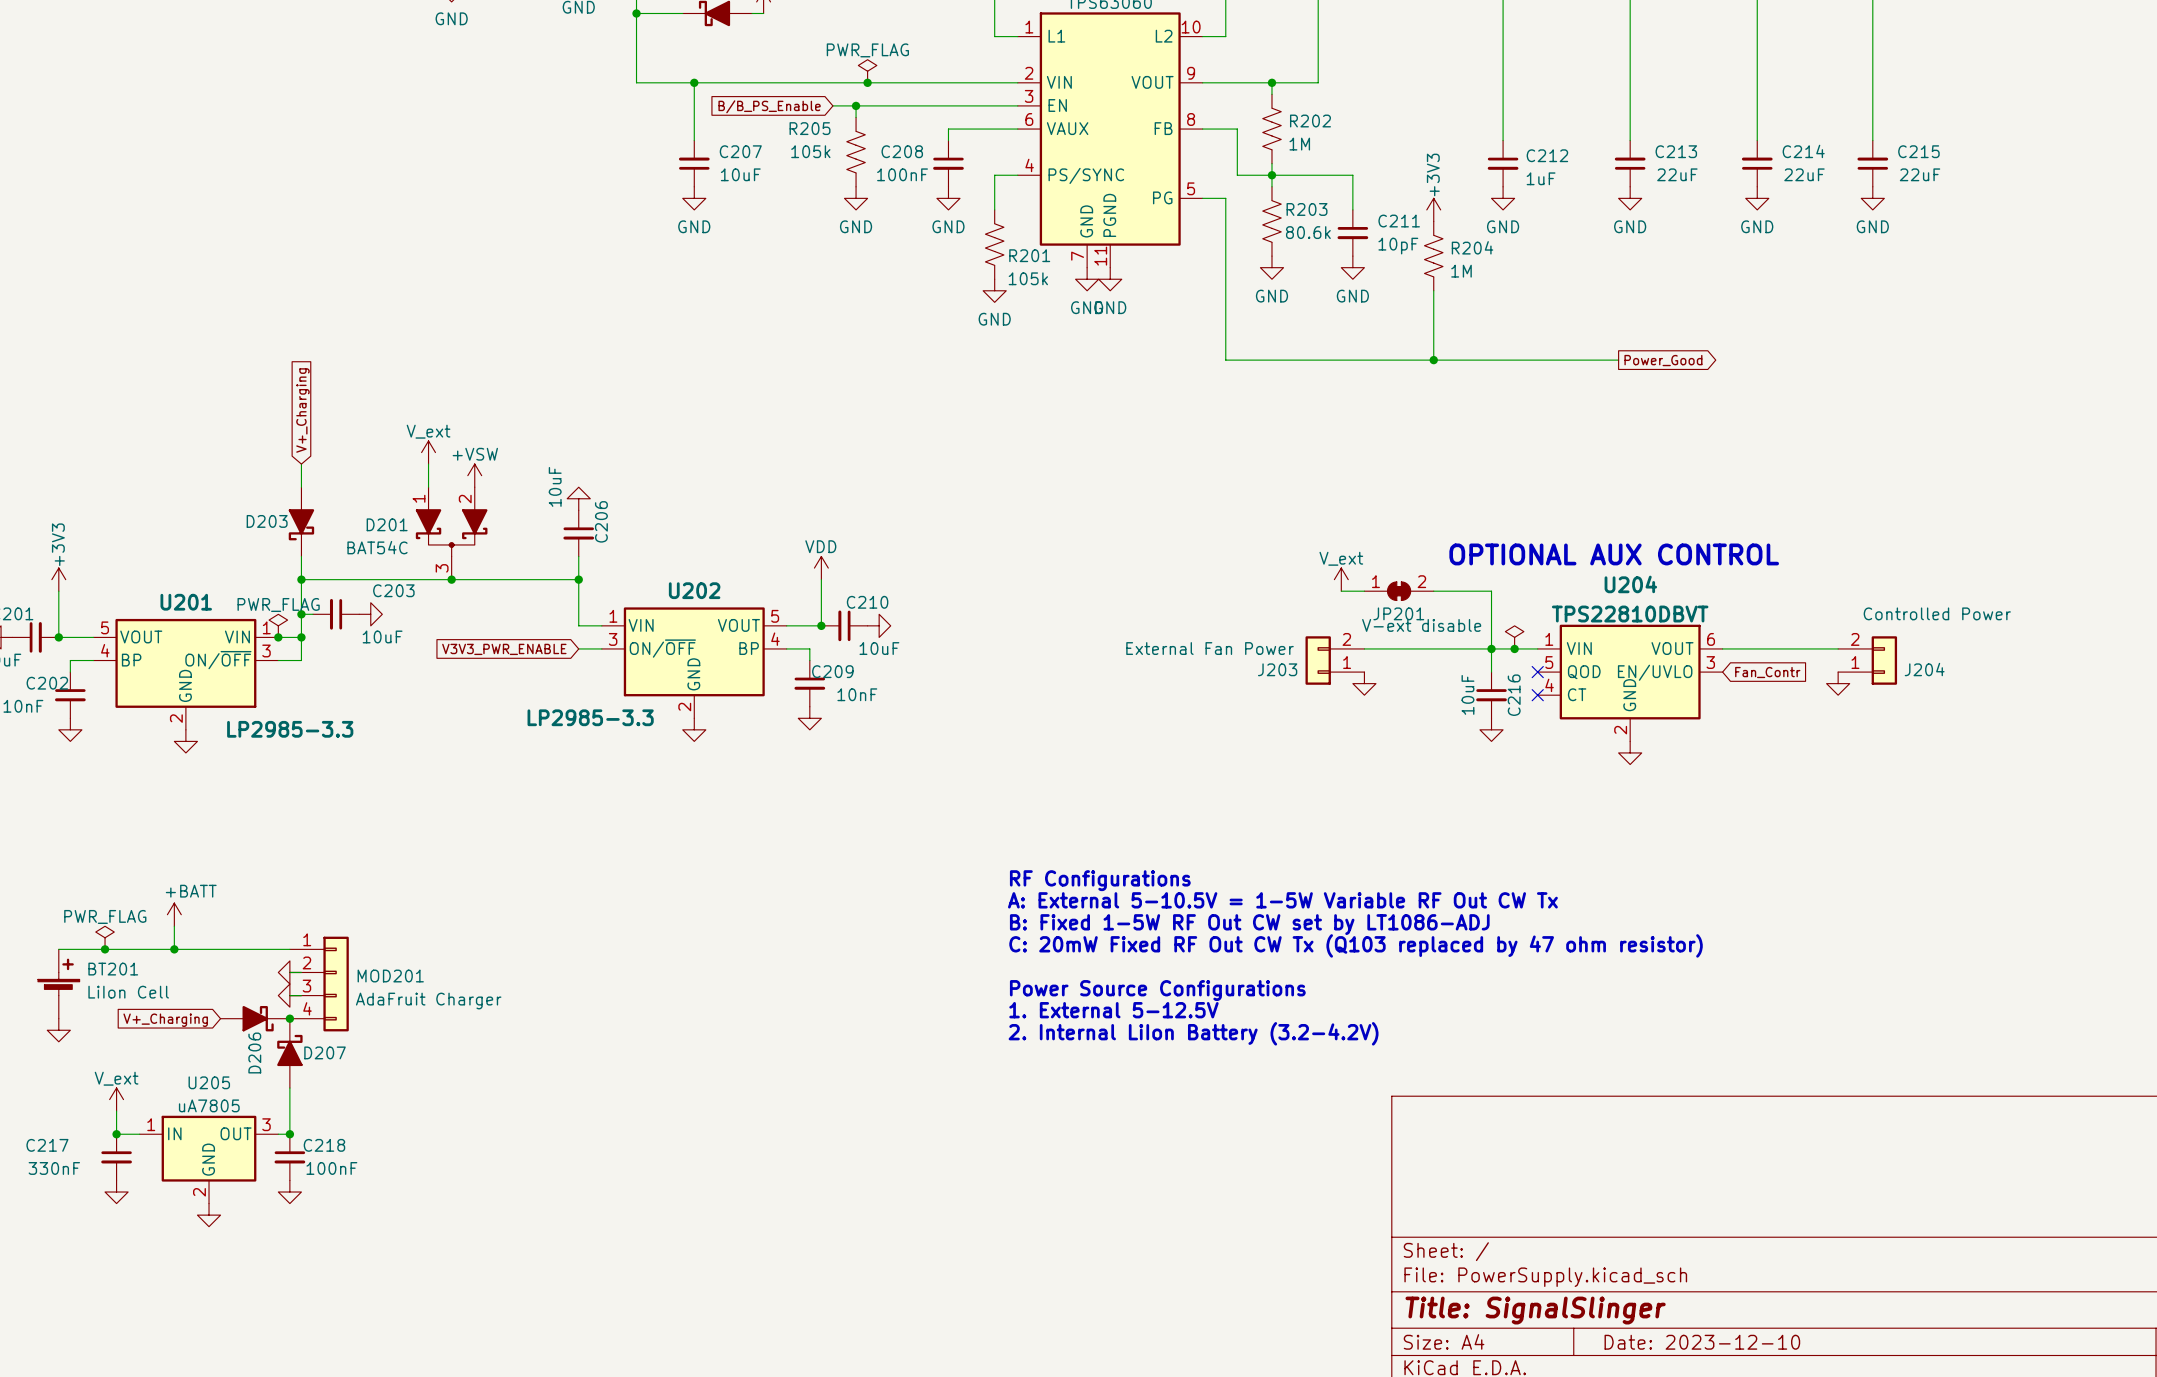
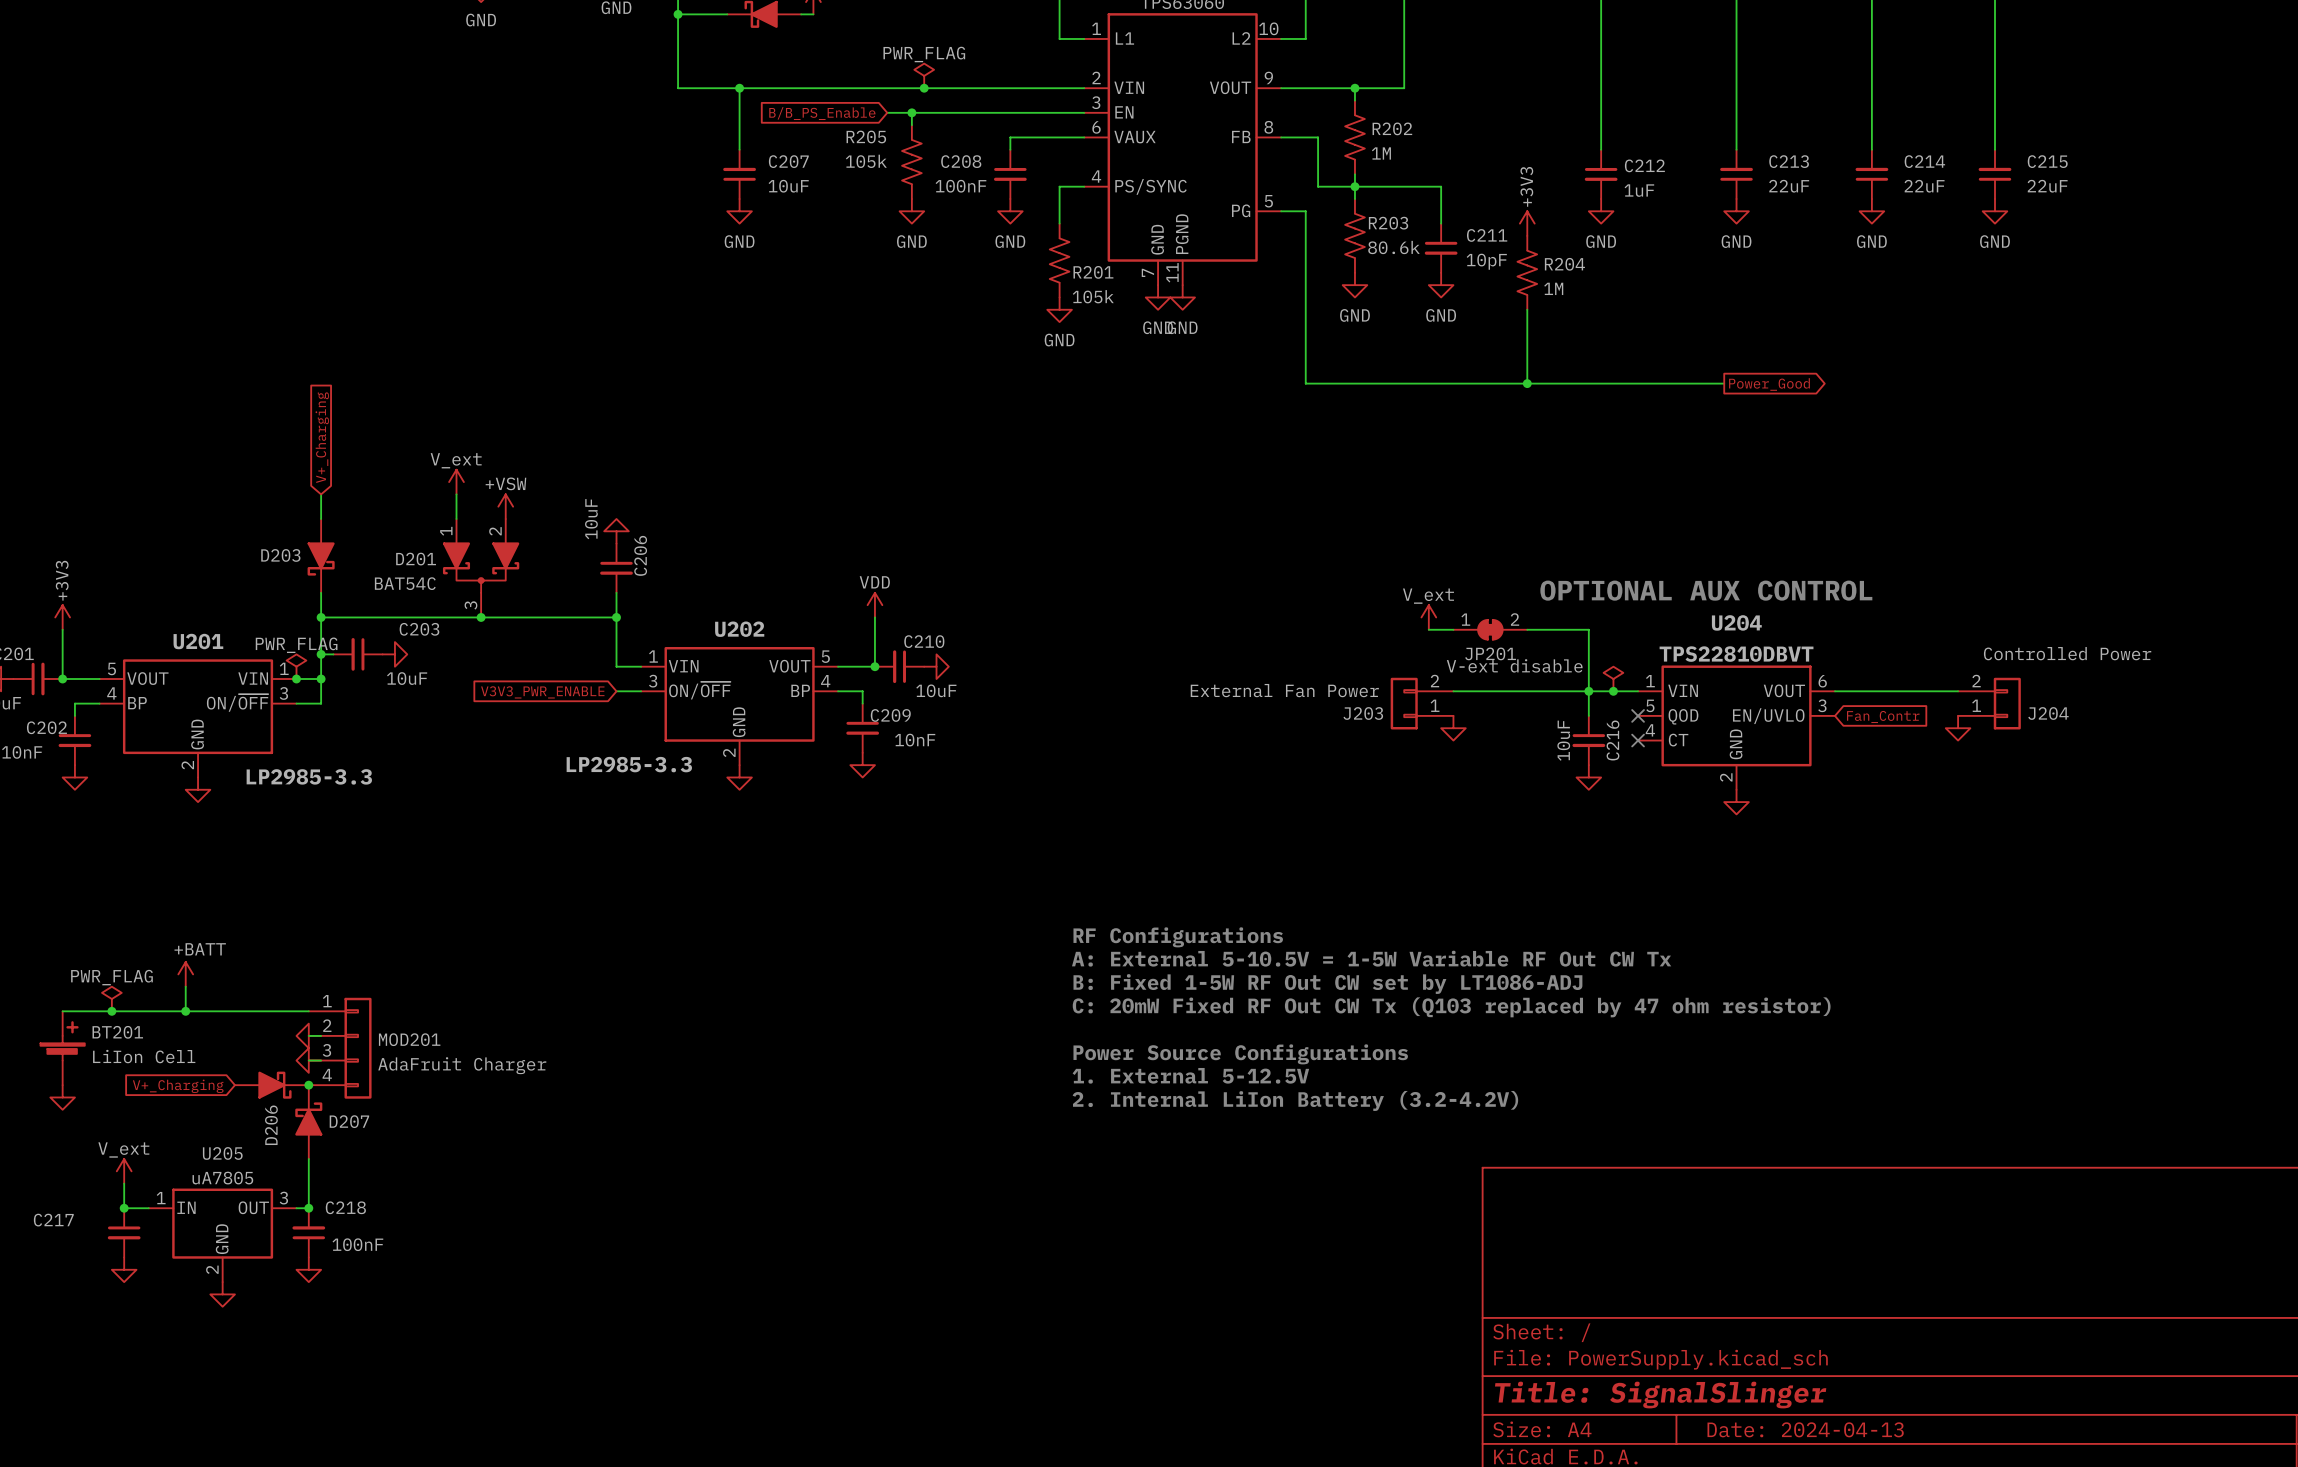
C218 rotation: 0° (289, 1157) -> 180° (308, 1232)
C217 value: 330nF (54, 1168) -> none
title block: Date: 2023-12-10 (1702, 1342) -> Date: 2024-04-13 (1805, 1429)

